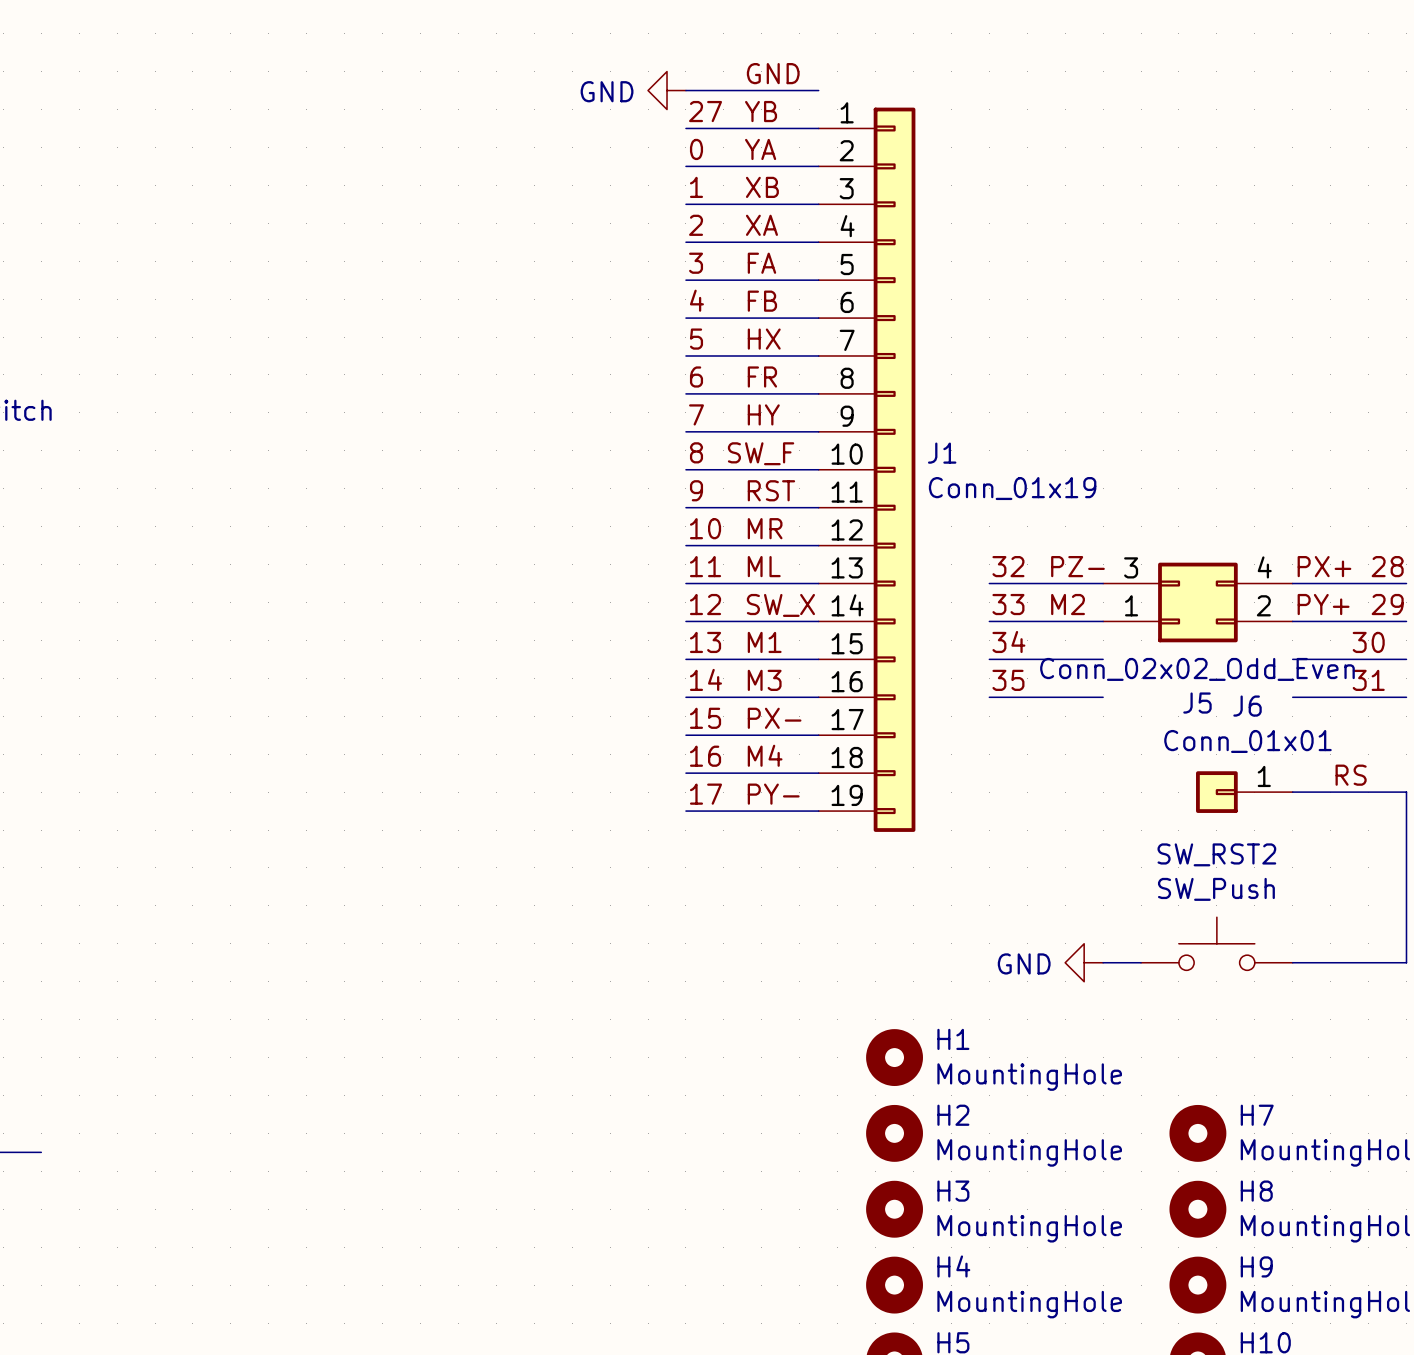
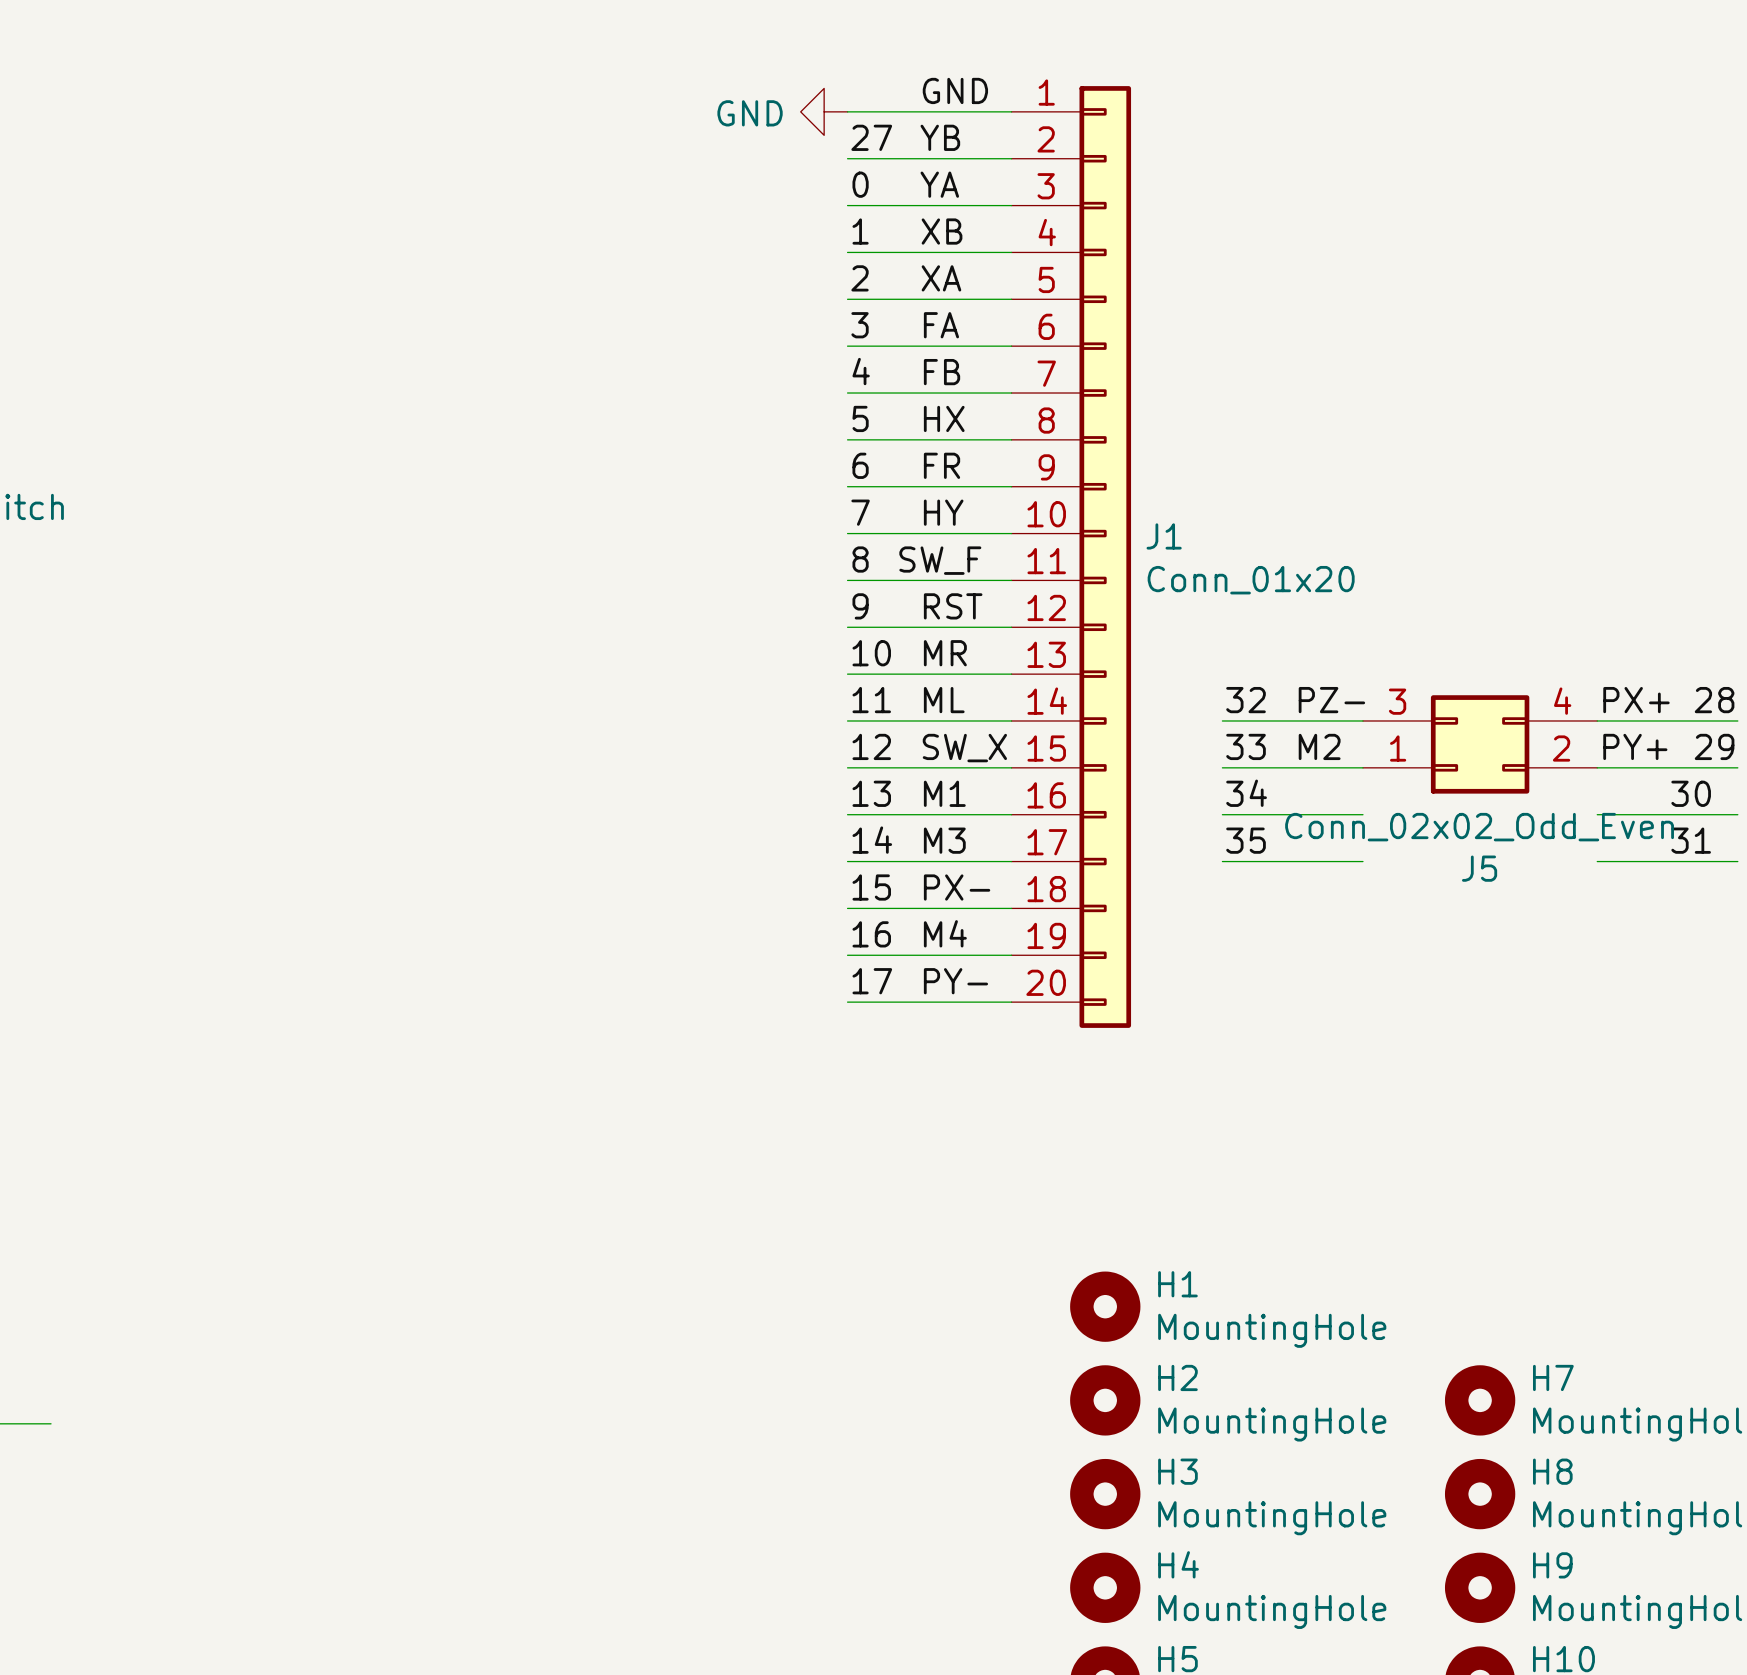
J1 symbol: [818, 107, 916, 832] -> [1011, 86, 1132, 1028]
J1 value: Conn_01x19 (1012, 488) -> Conn_01x20 (1251, 580)
label: RS (1351, 775) -> none
J6: Conn_01x01 (1244, 792) -> none
wire: (1292, 792) (1406, 792) (1406, 962) (1292, 962) -> none
SW_RST2: SW_Push (1216, 943) -> none
power symbol: GND (1084, 962) -> none
wire: (1103, 962) (1141, 962) -> none

